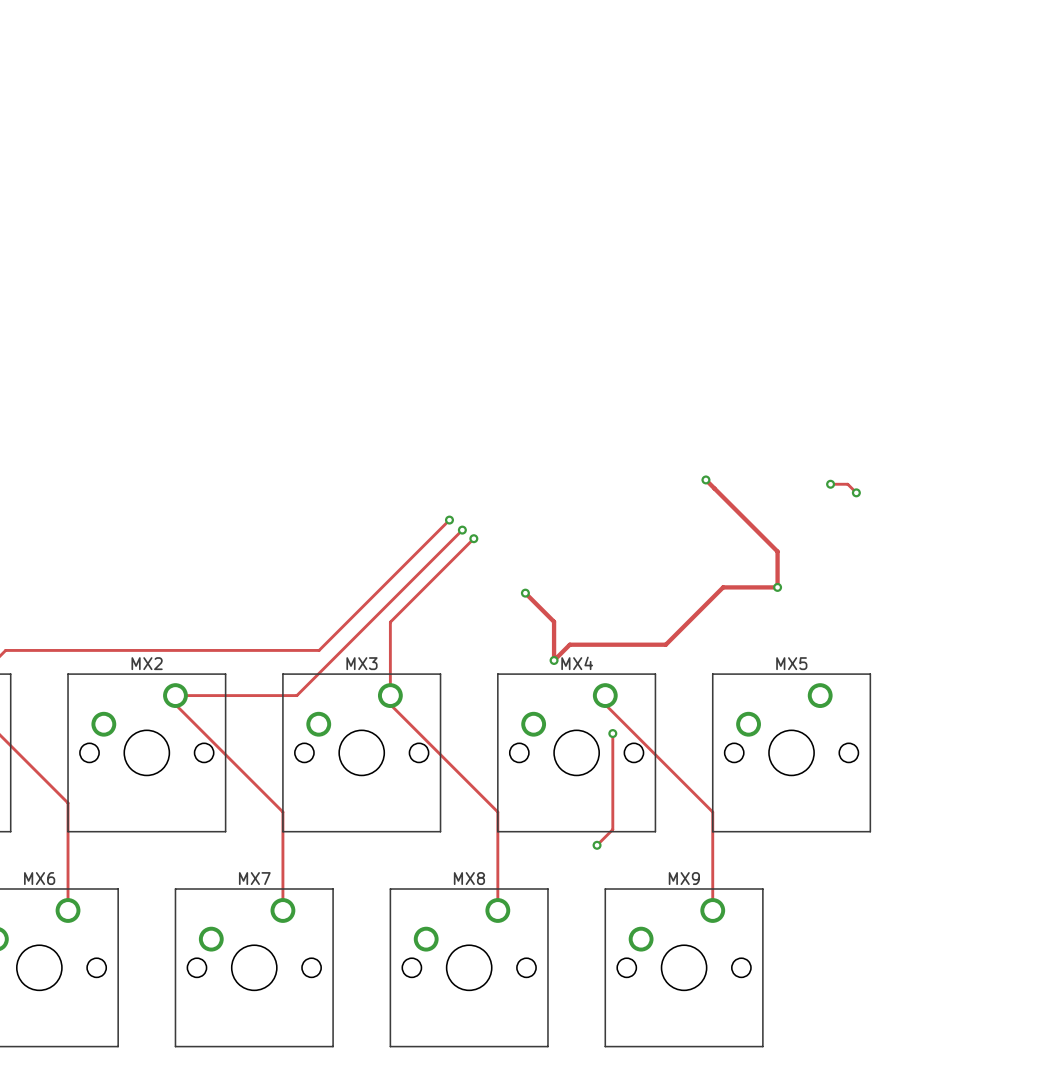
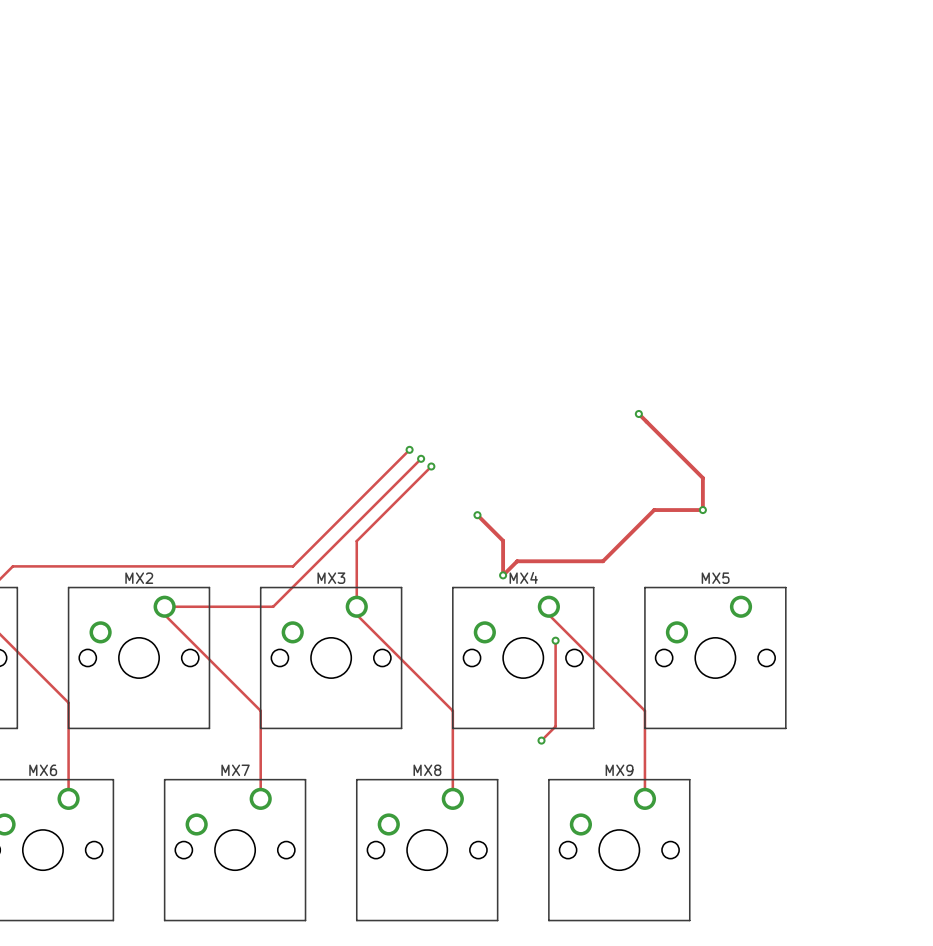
track: (830, 484) (847, 484) (856, 492) -> none
via: (830, 484) -> none
via: (856, 492) -> none

